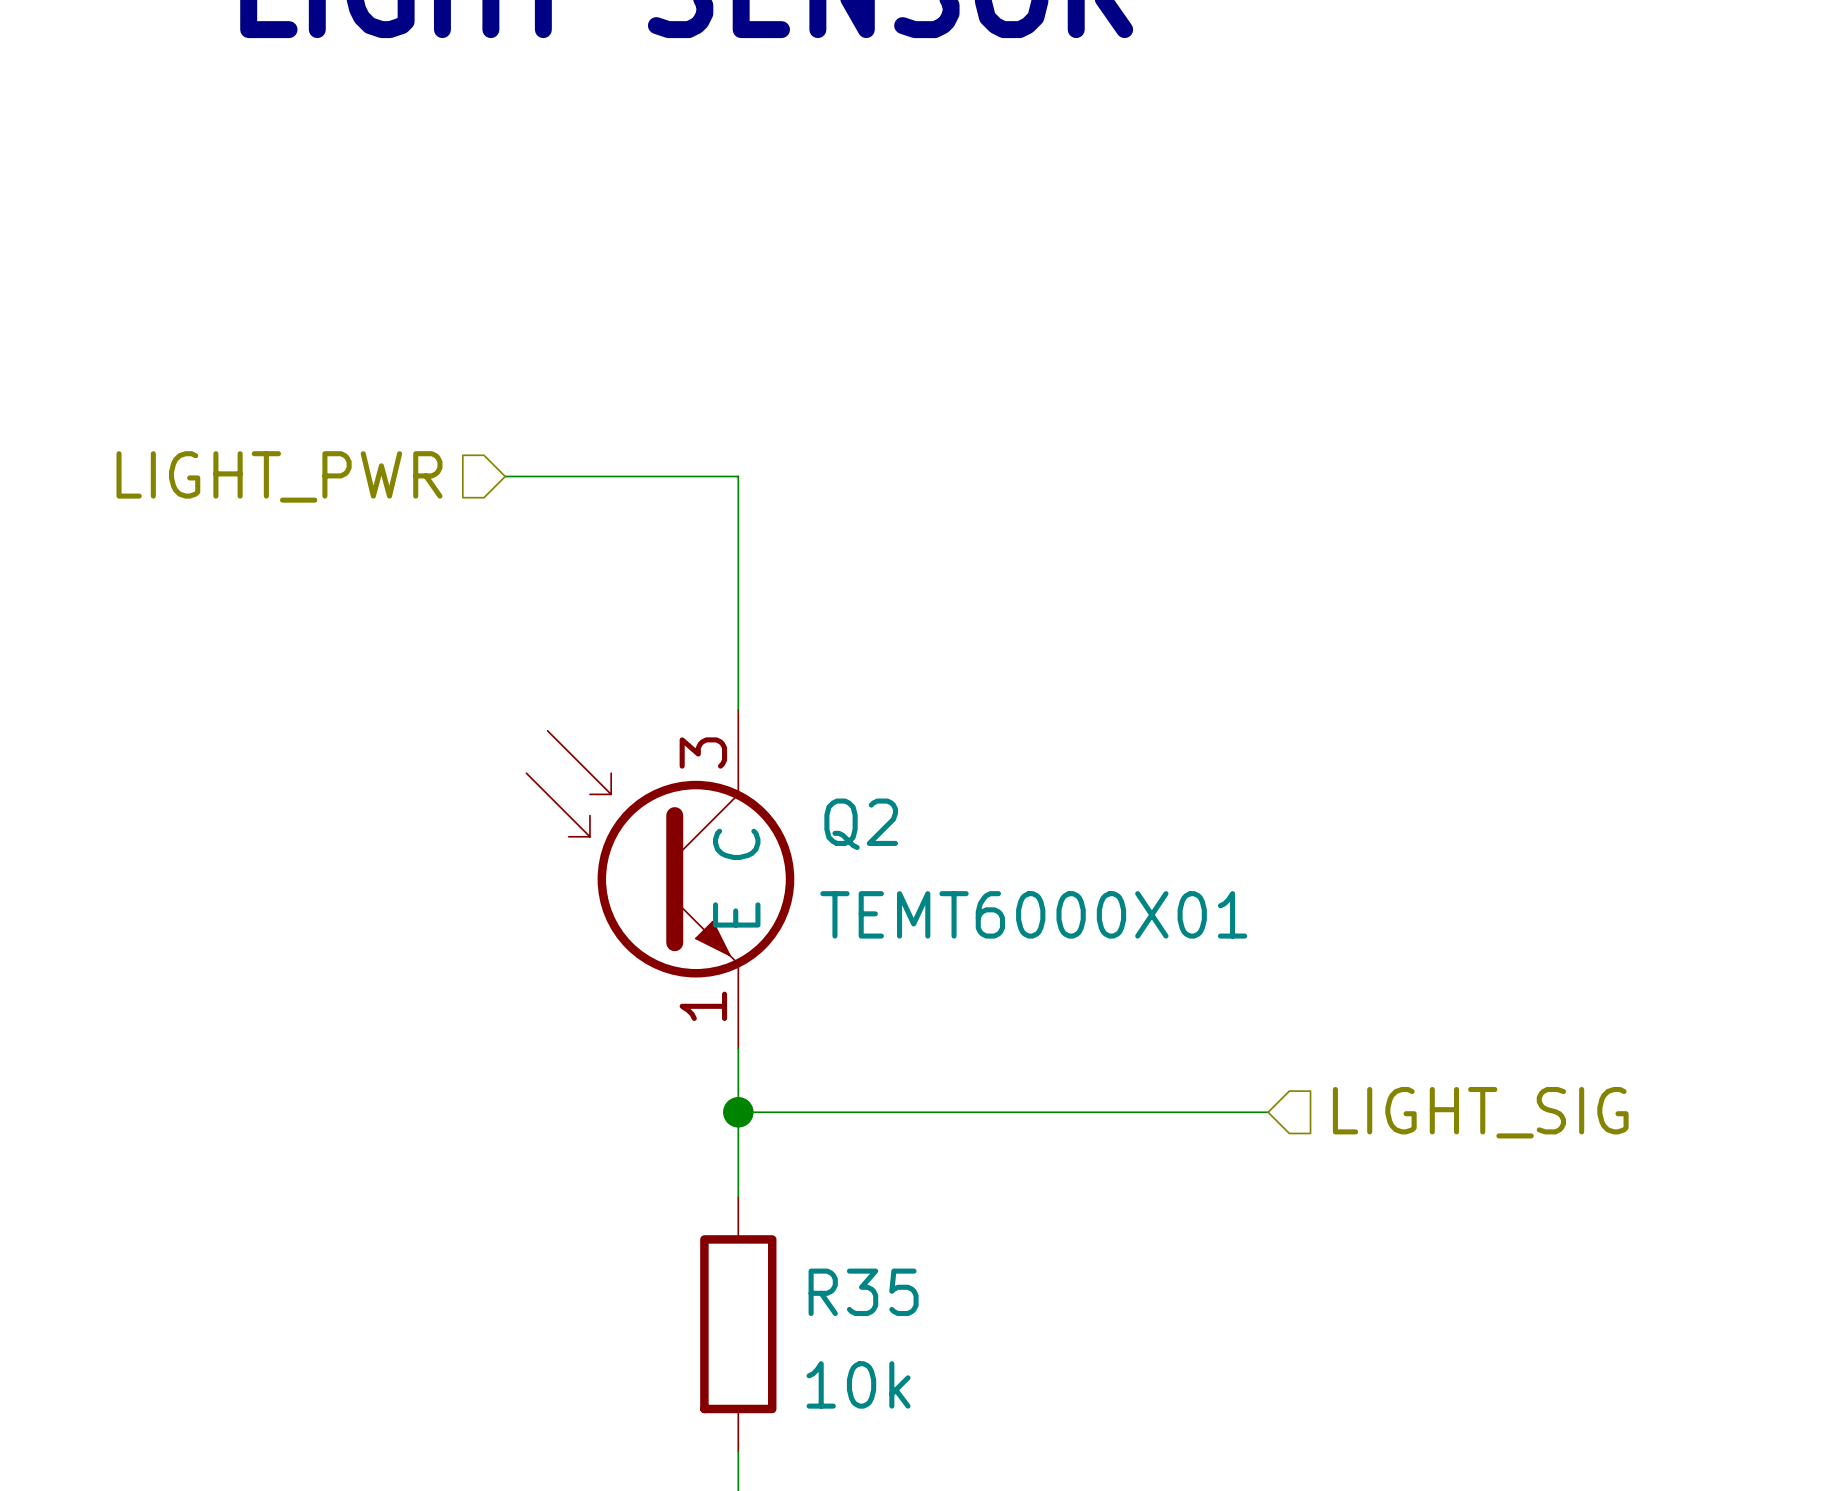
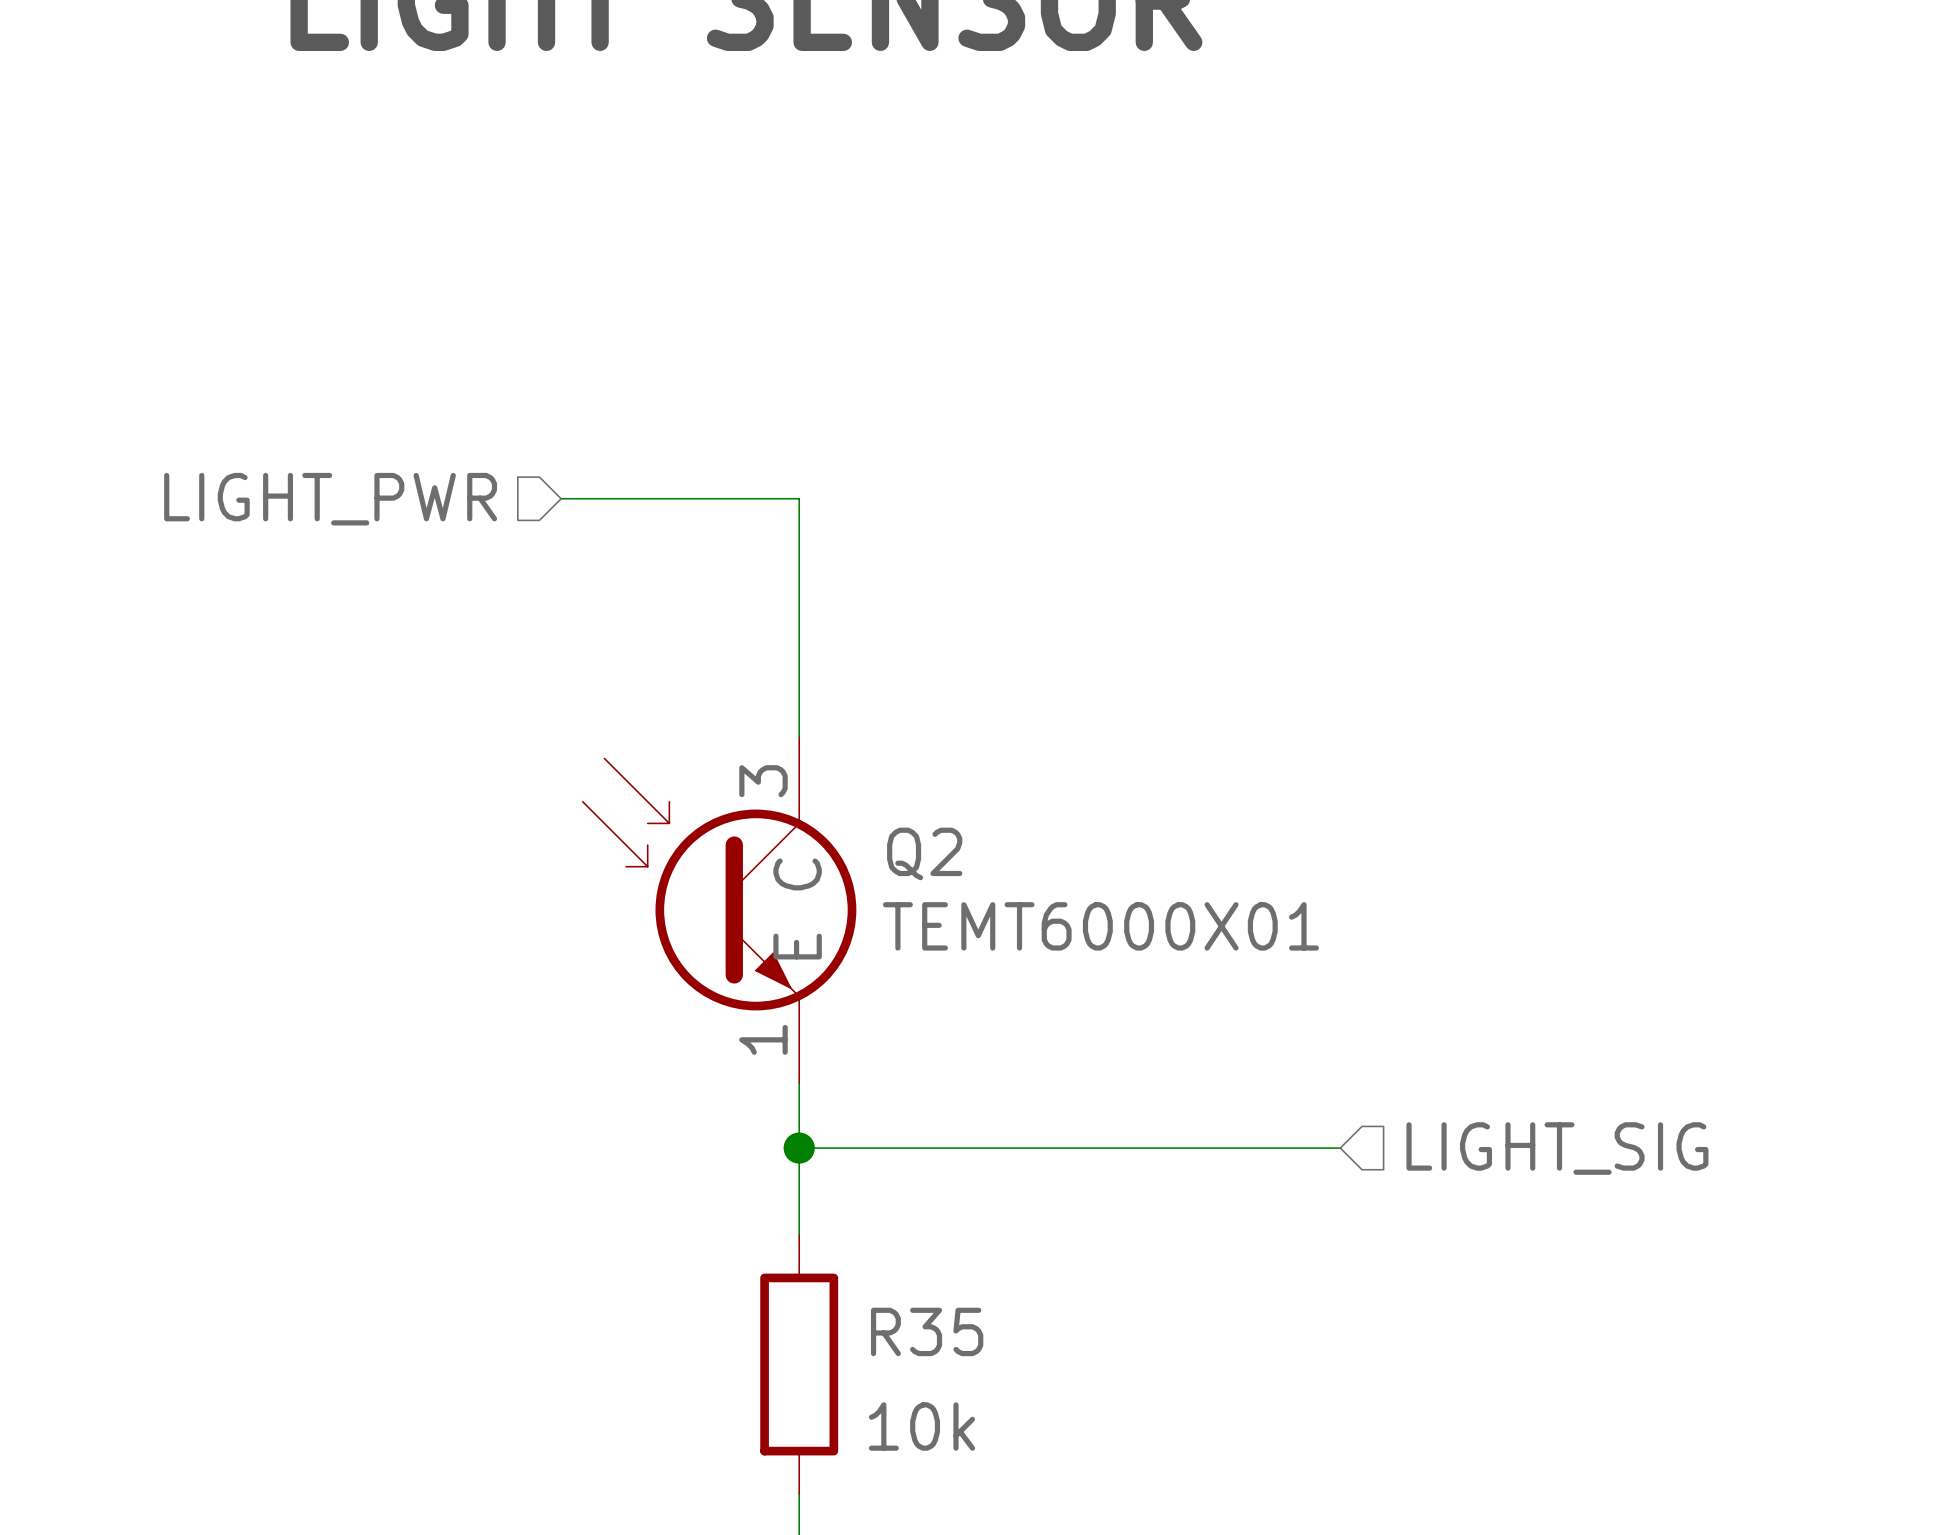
Q2 value position: TEMT6000X01 (1033, 914) -> TEMT6000X01 (1100, 926)

